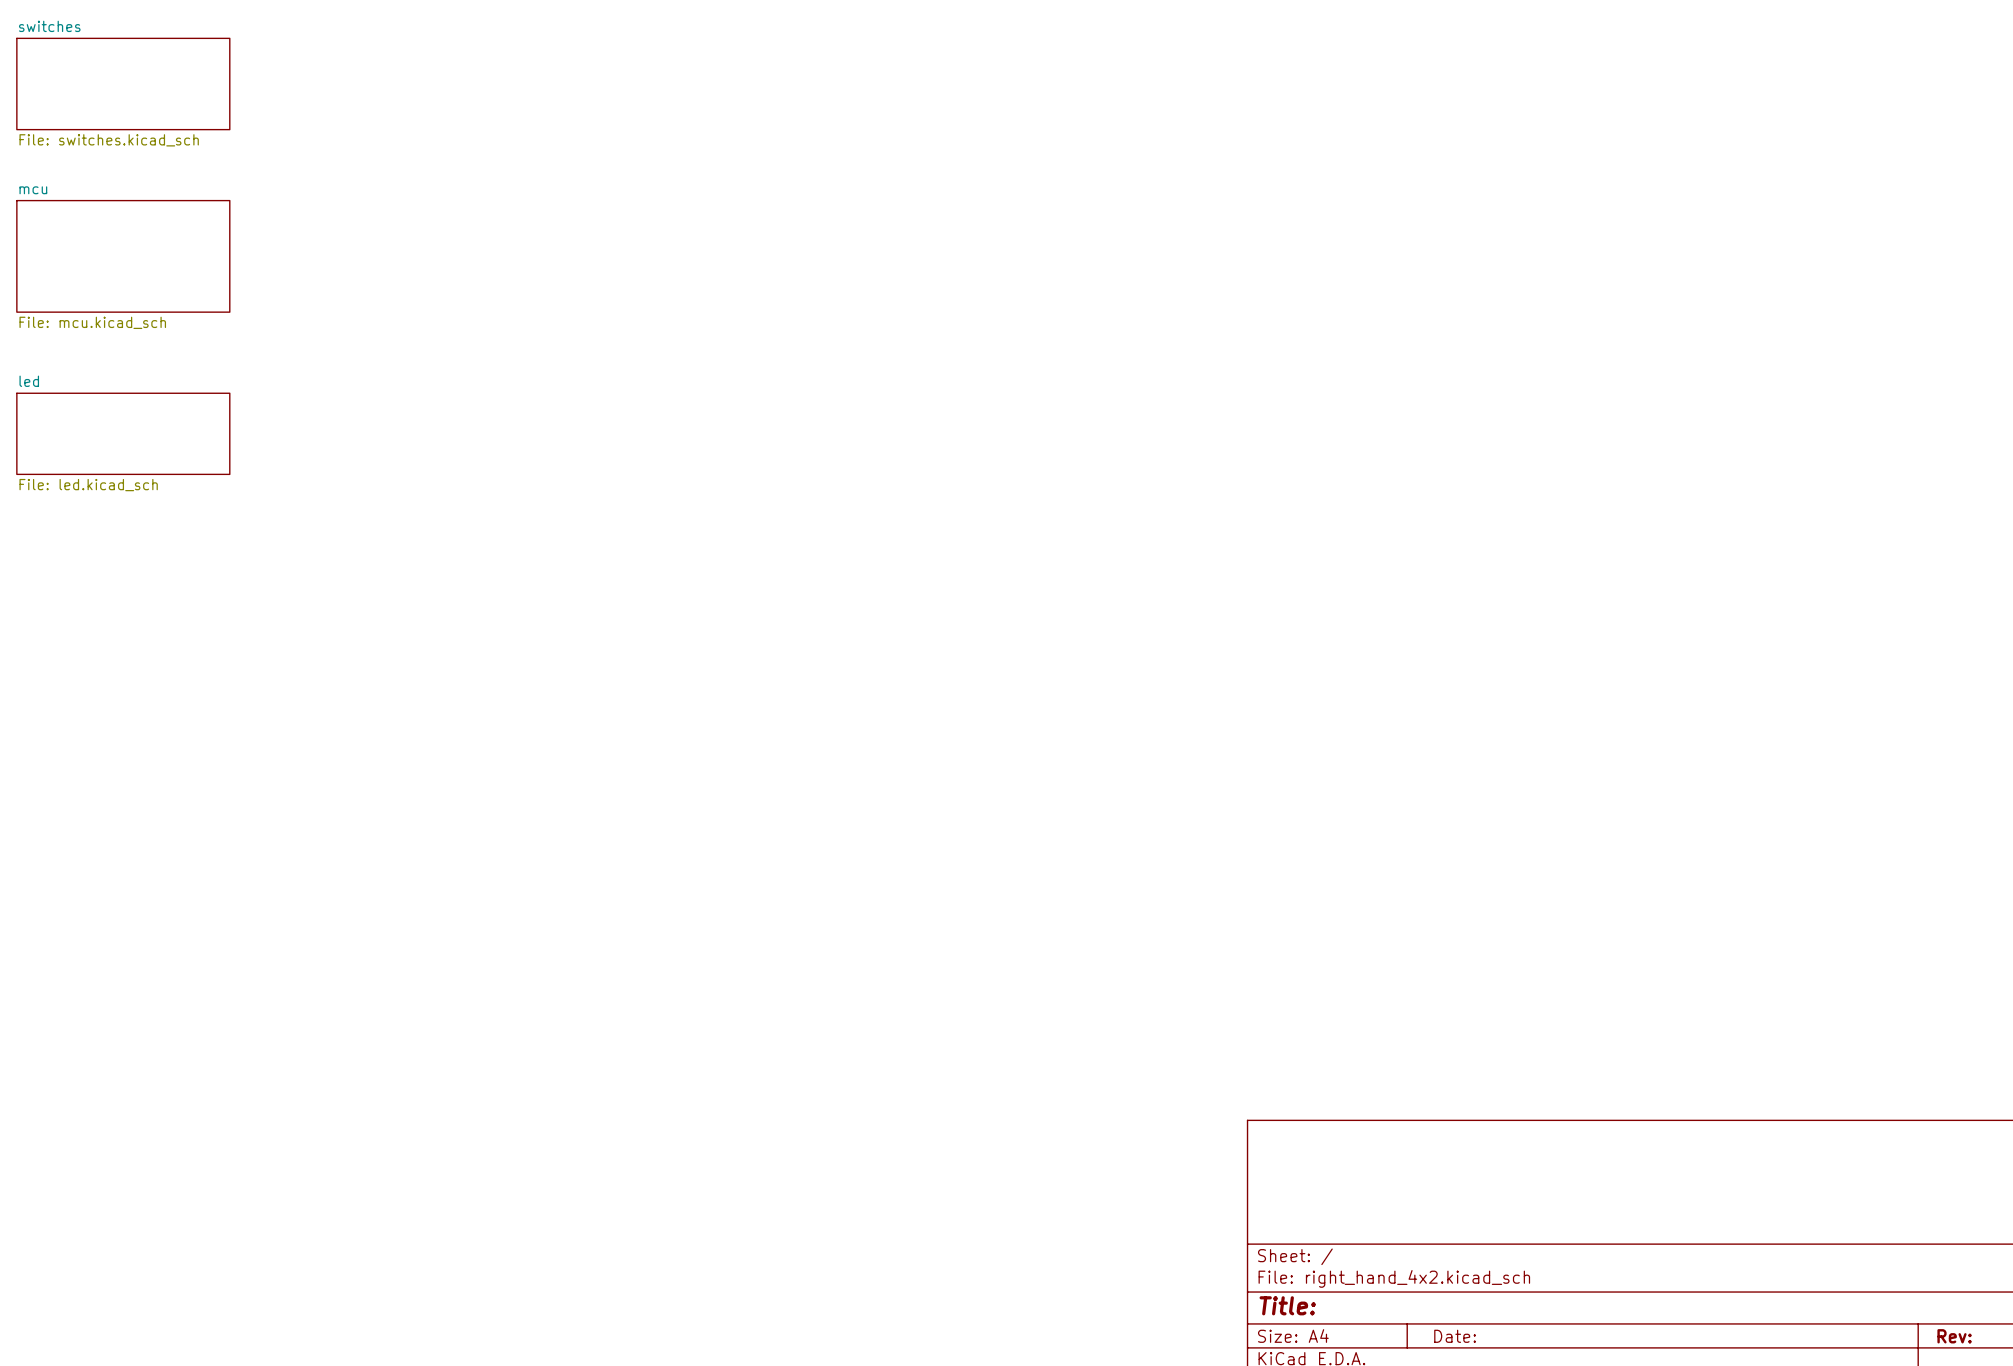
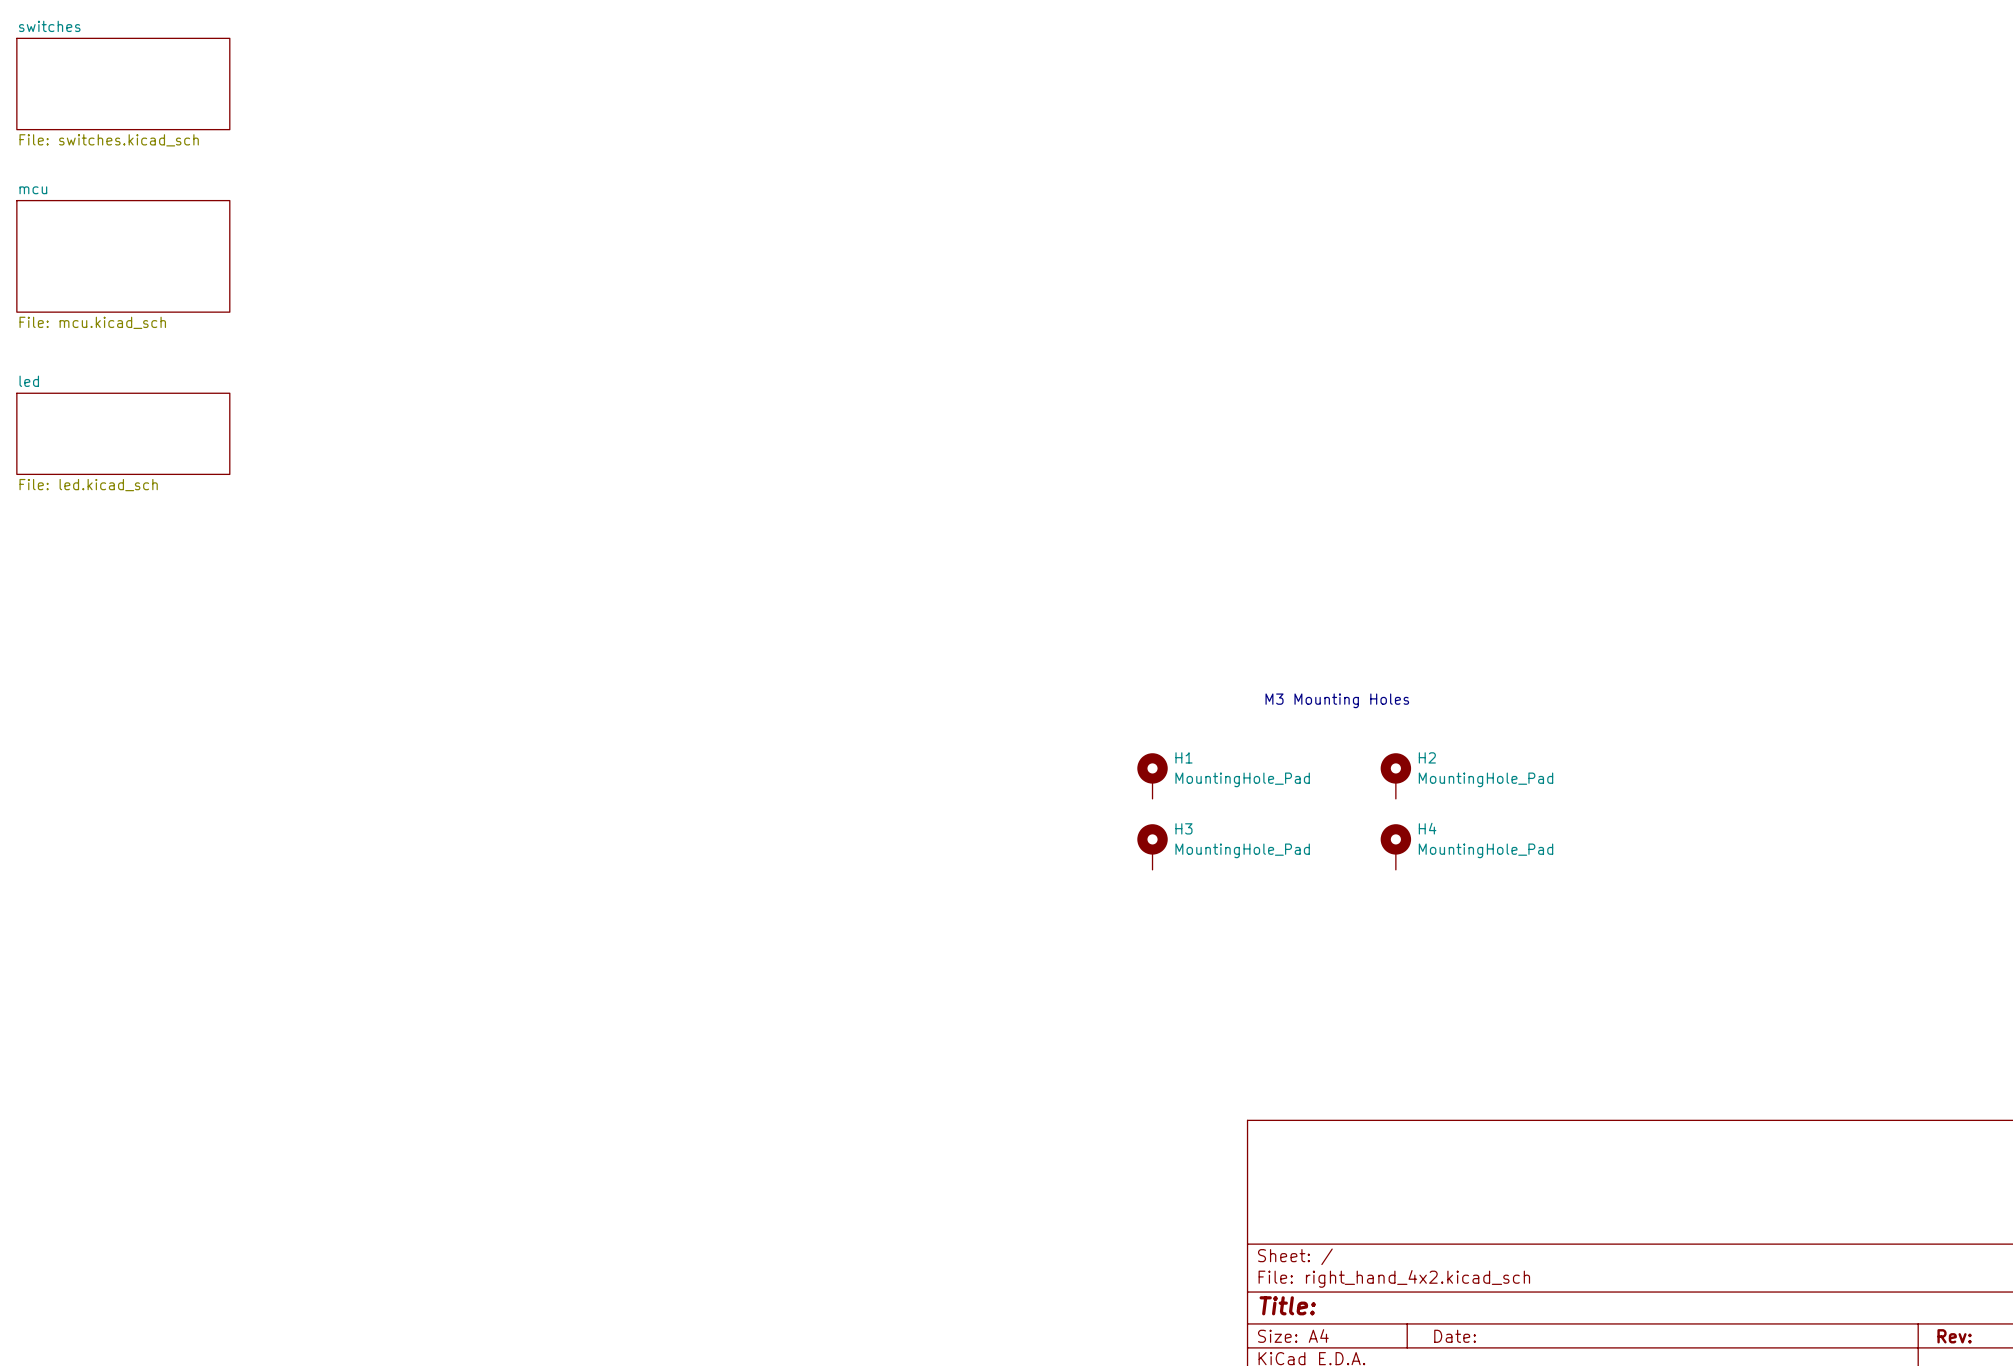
text: none -> M3 Mounting Holes (1337, 700)
H1: none -> MountingHole_Pad (1152, 776)
H2: none -> MountingHole_Pad (1395, 776)
H3: none -> MountingHole_Pad (1152, 847)
H4: none -> MountingHole_Pad (1395, 847)

